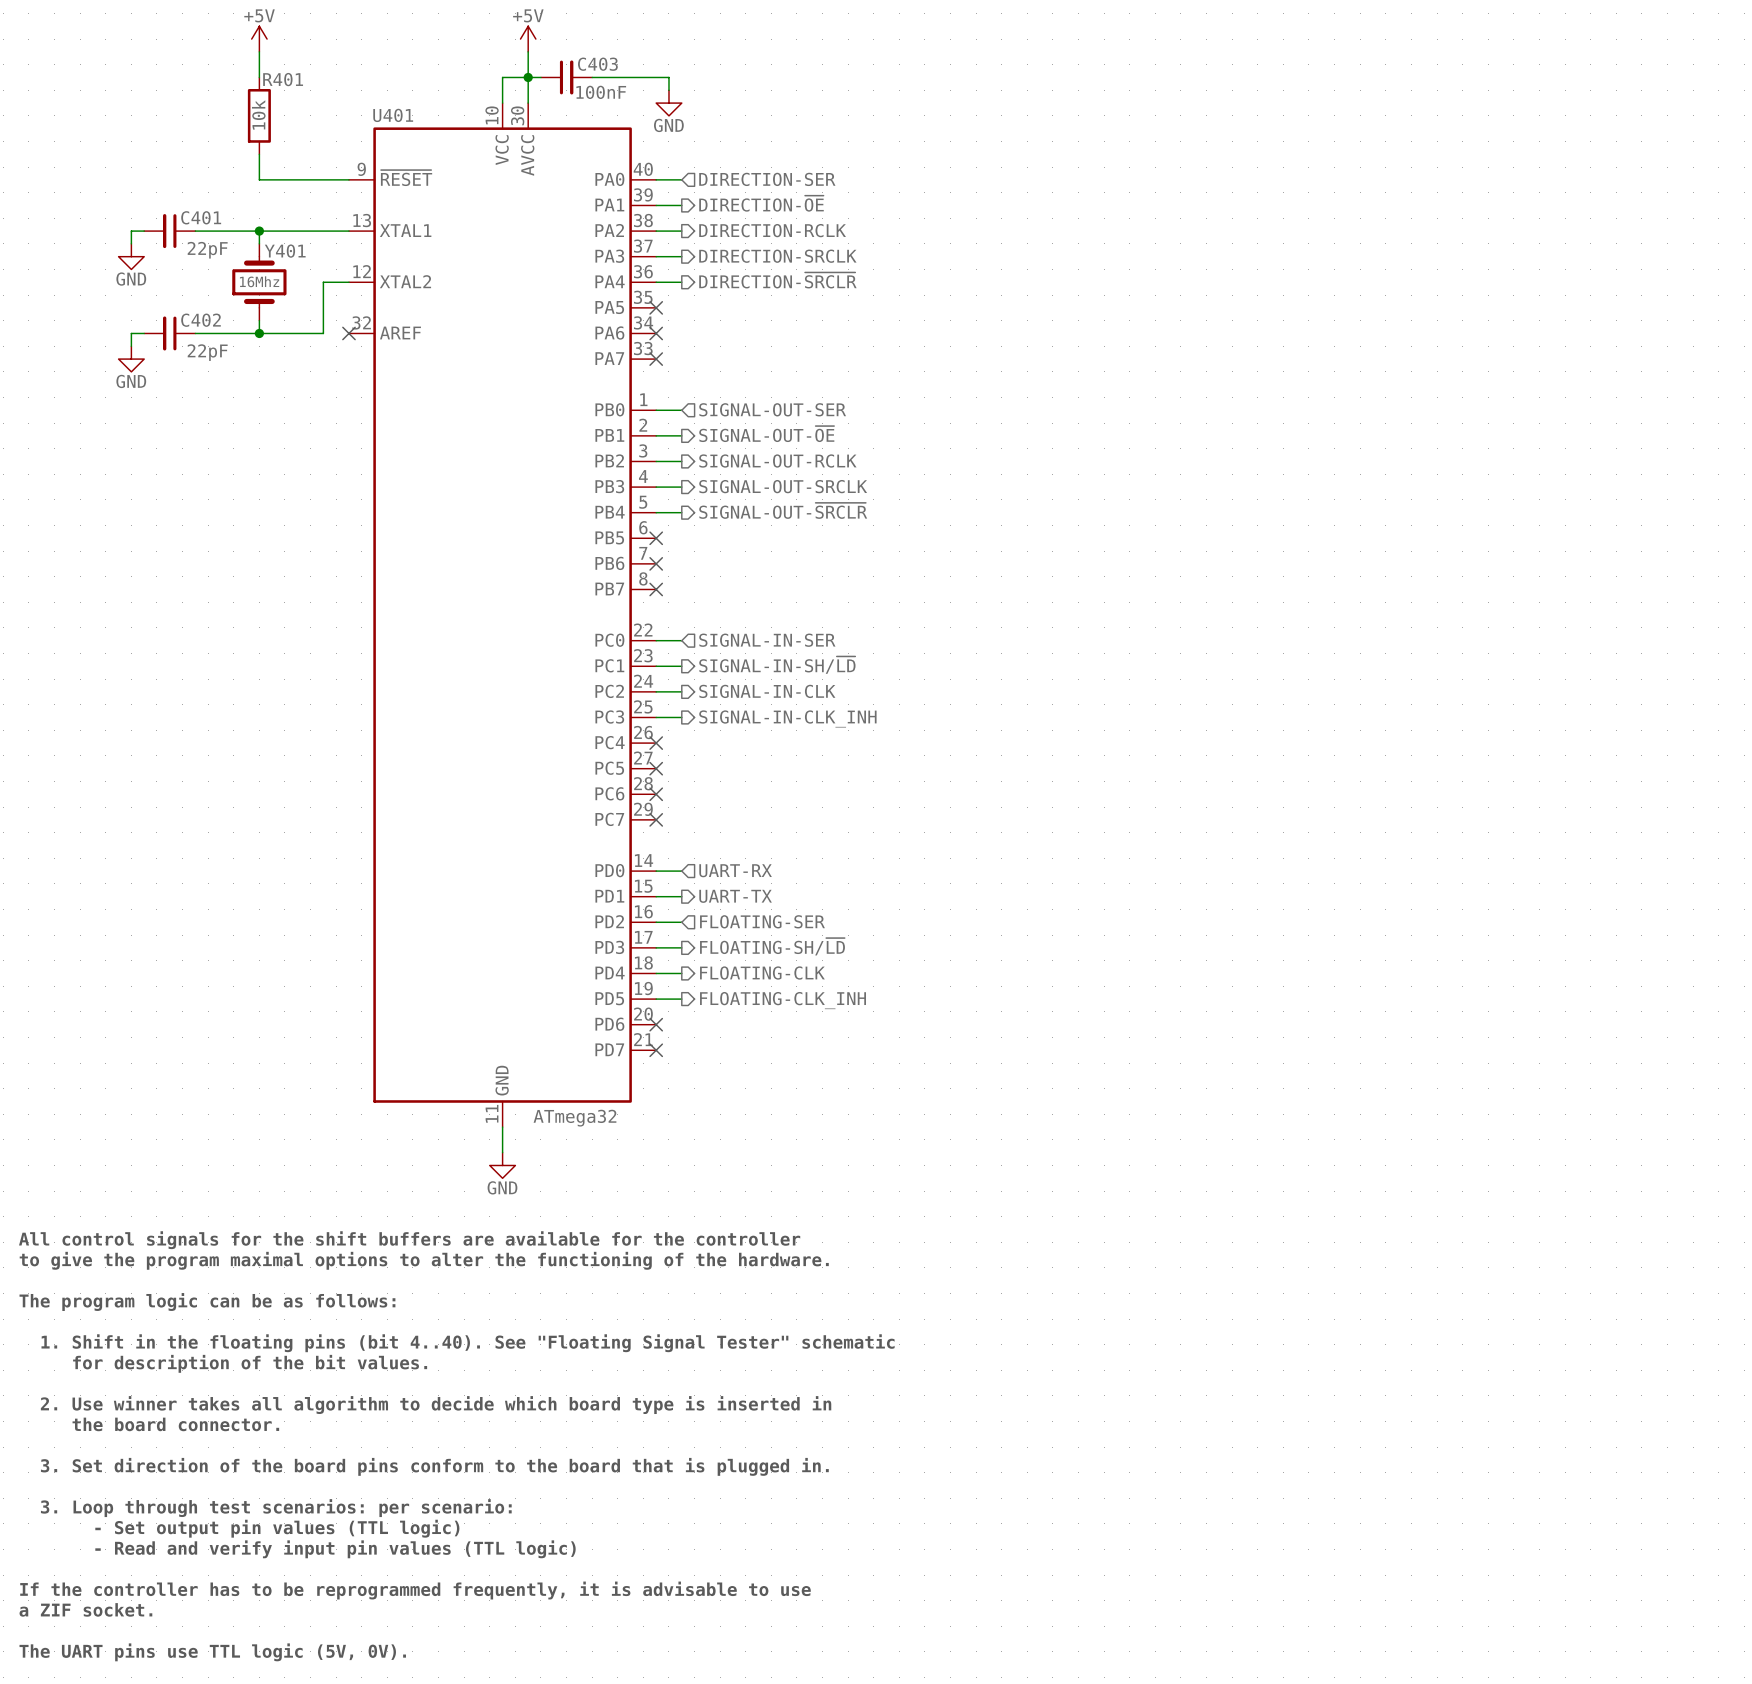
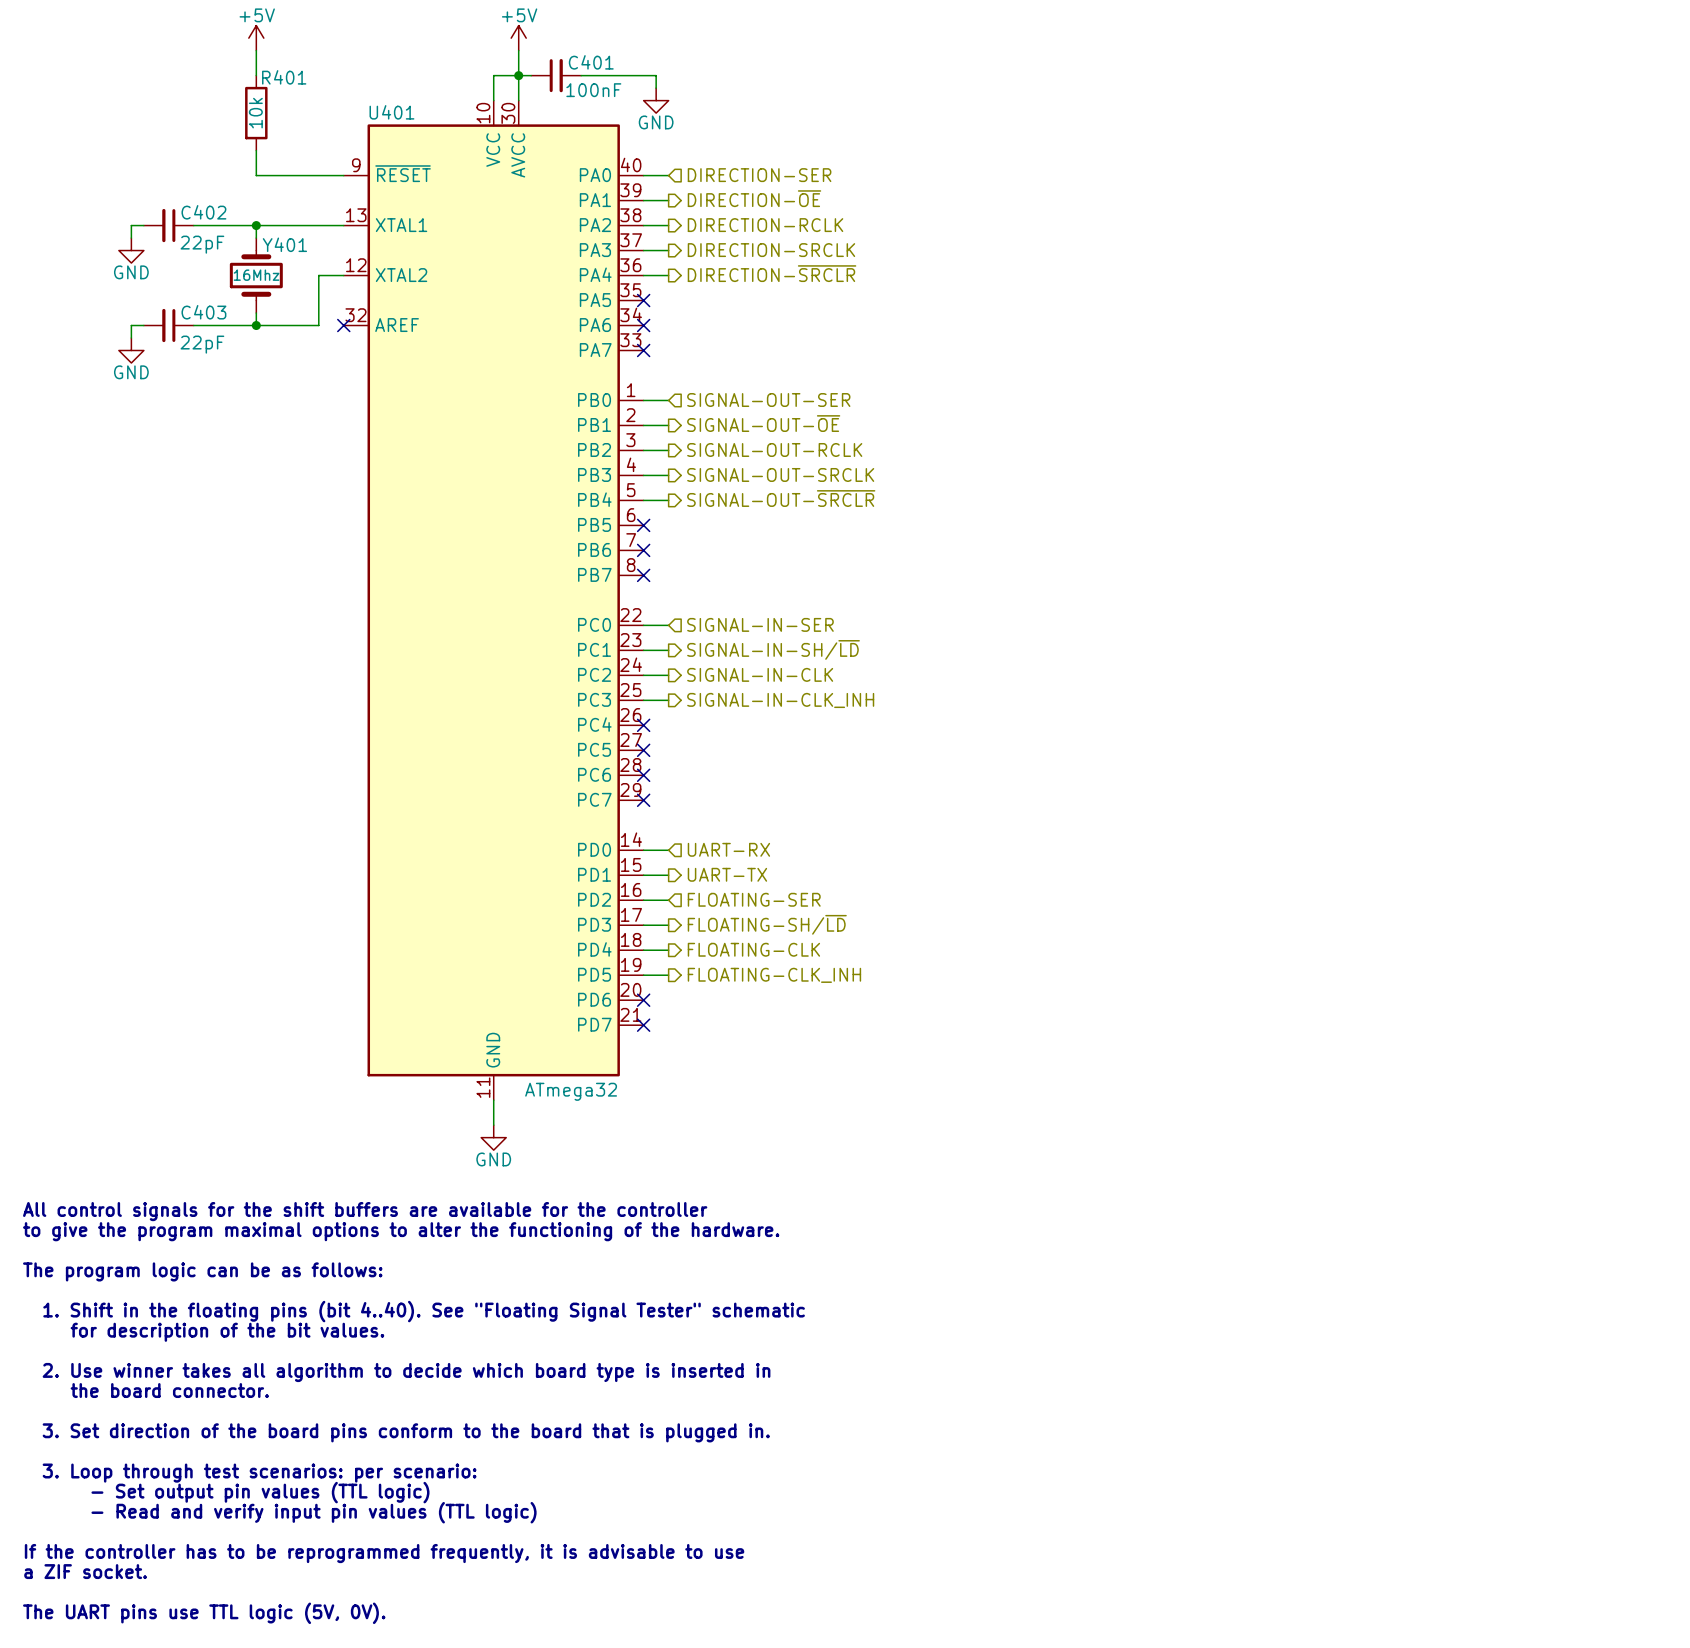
C403 name: C403 (597, 64) -> C401 (591, 62)
C401 name: C401 (201, 217) -> C402 (203, 212)
C402 name: C402 (201, 320) -> C403 (203, 312)

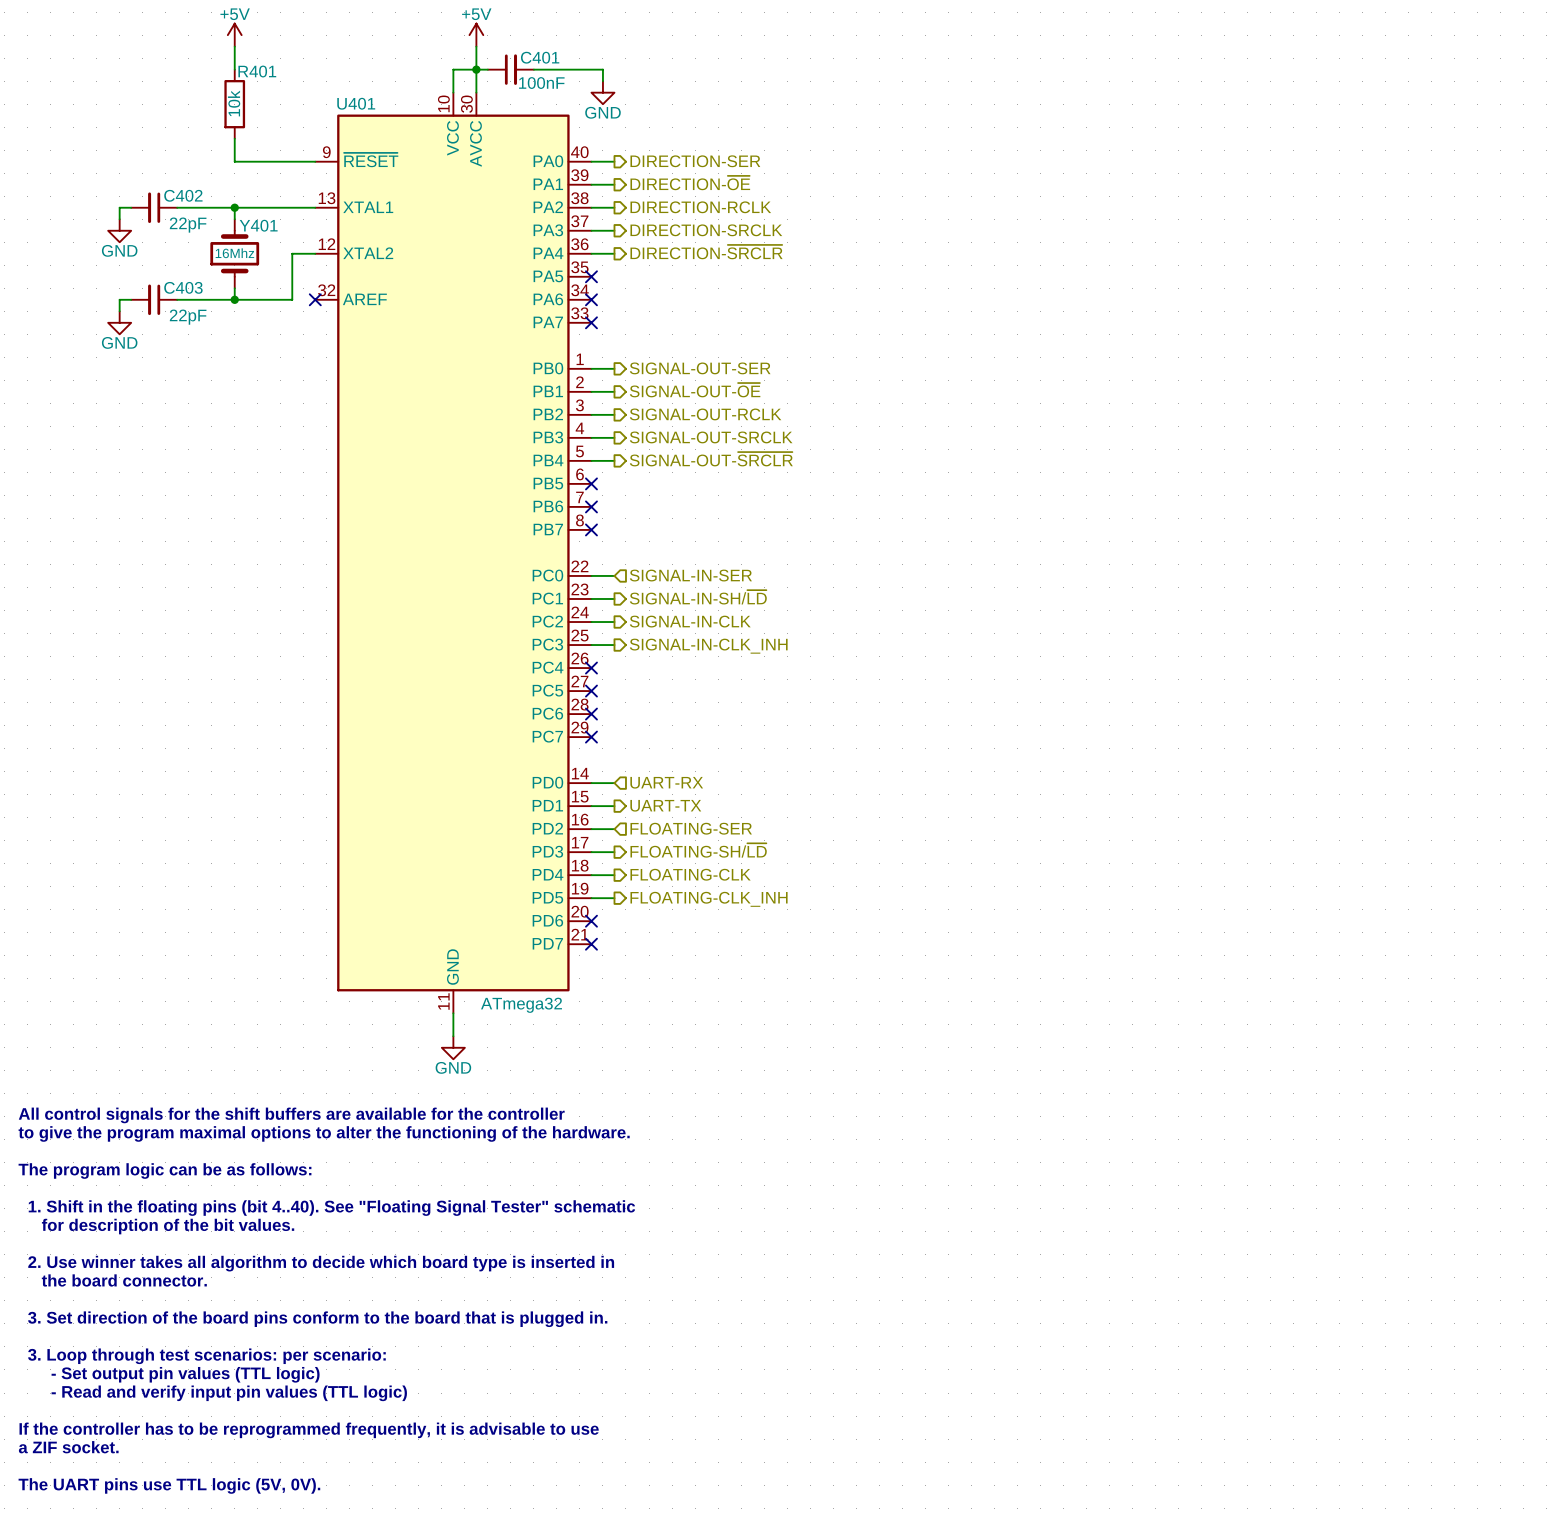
hierarchical label shape: input (759, 175) -> output (695, 161)
hierarchical label shape: input (768, 400) -> output (700, 368)

